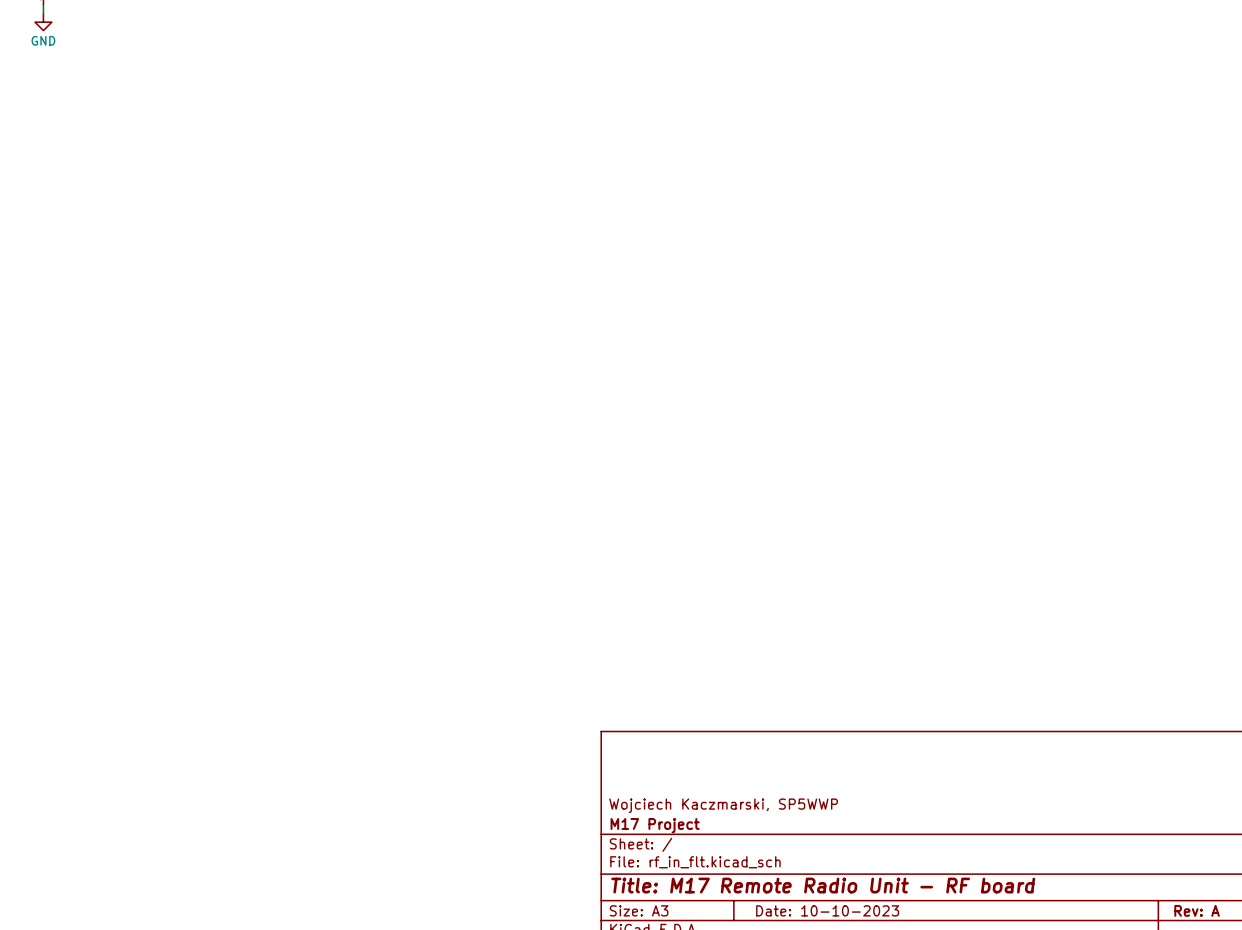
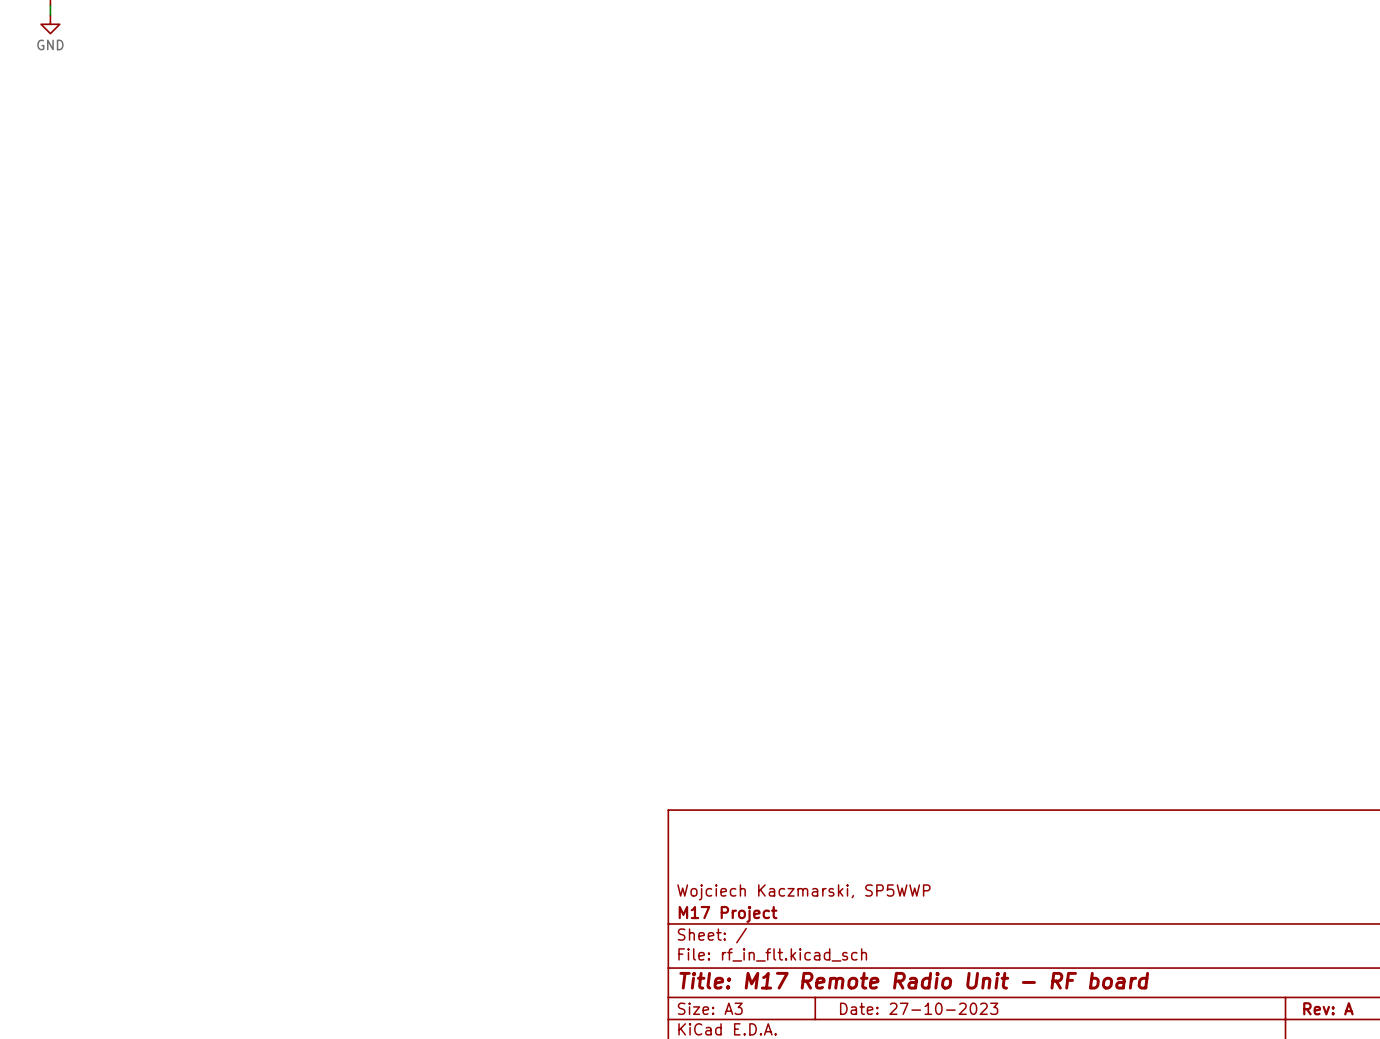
title block: Date: 10-10-2023 (827, 910) -> Date: 27-10-2023 (919, 1008)

